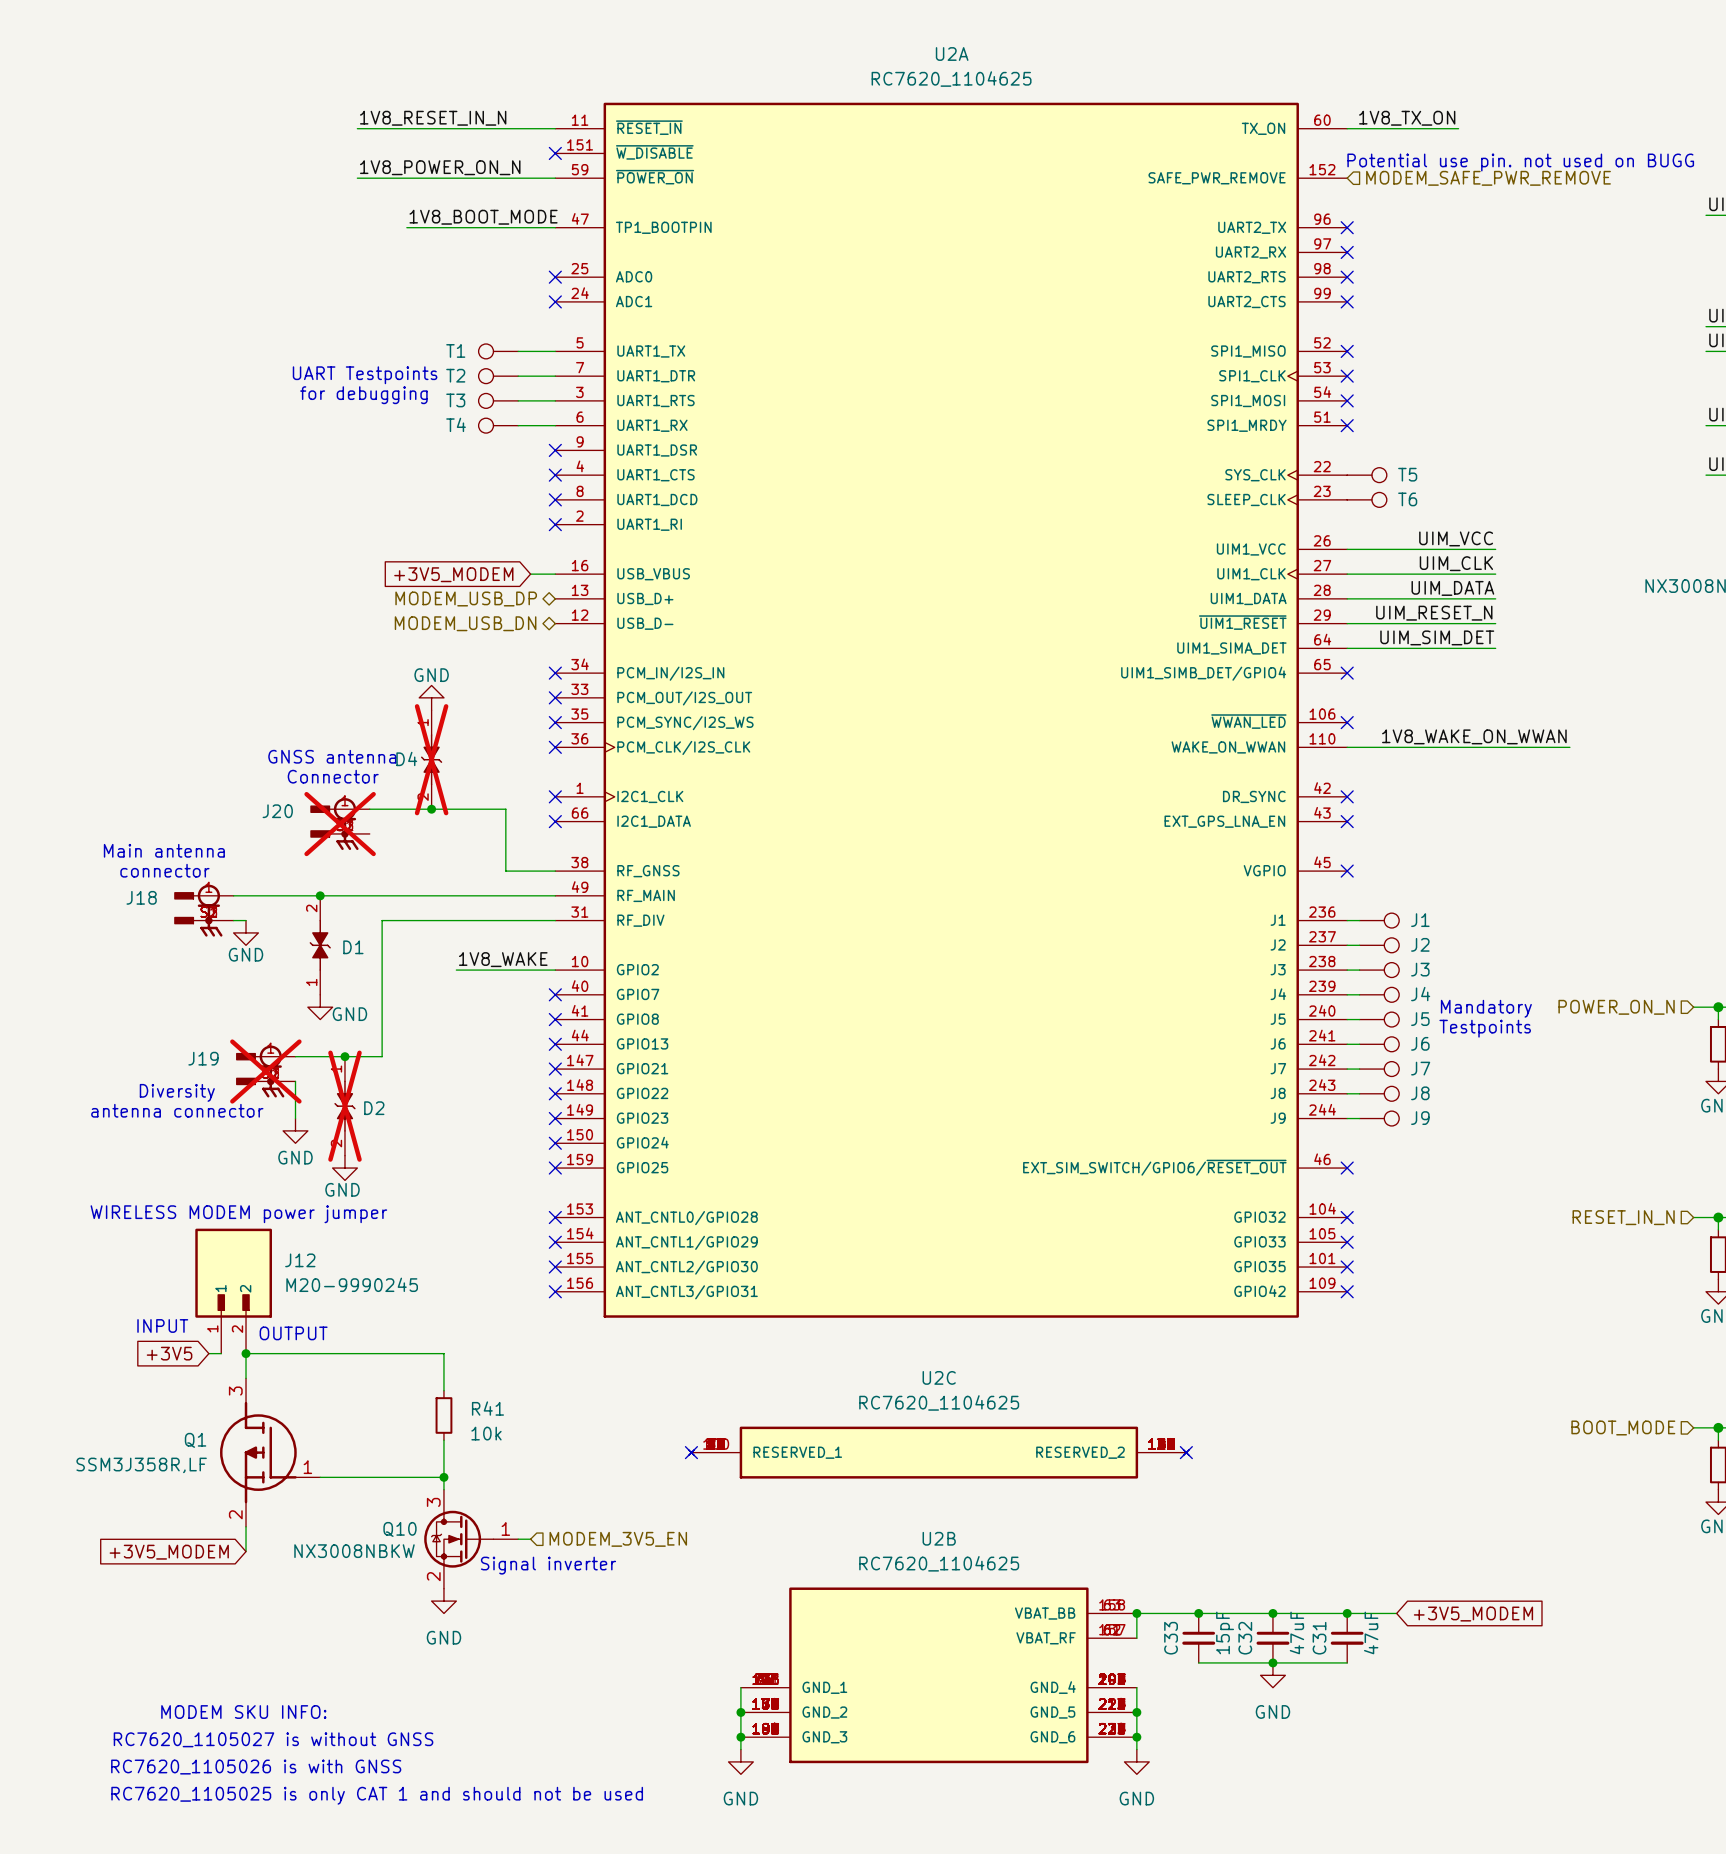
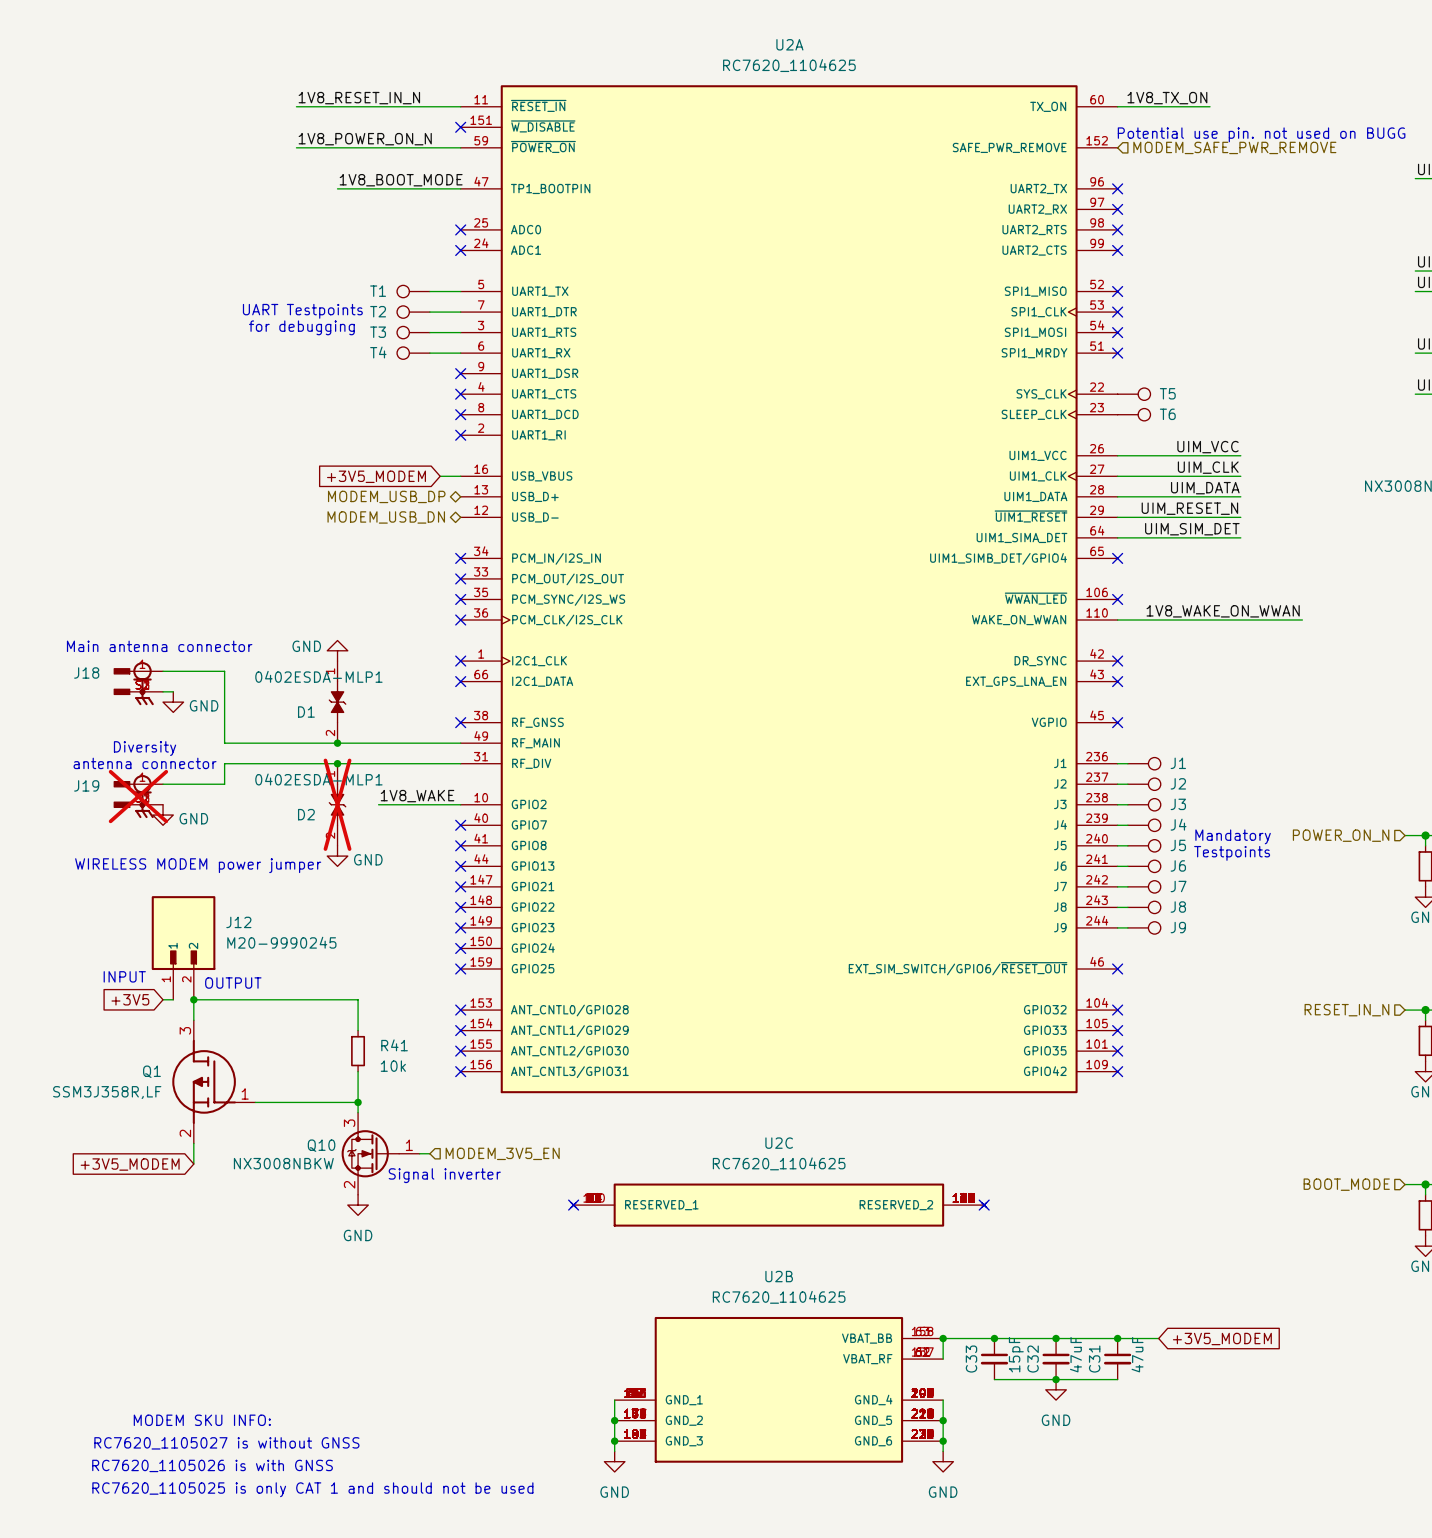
power symbol text position: GND (431, 675) -> GND (306, 646)
power symbol position: GND (431, 697) -> GND (337, 650)
text: GNSS antenna (332, 756) -> none
D4: (431, 759) -> none
text: Connector (333, 776) -> none
text: none -> Main antenna connector (159, 646)
wire: (369, 809) (505, 809) (505, 871) (555, 871) -> none
junction: (431, 809) -> none
D1 value: none -> 0402ESDA-MLP1 (318, 676)
J20: (340, 824) -> none
power symbol: none -> GND (173, 702)
text: Main antenna (164, 850) -> none
text: connector (164, 870) -> none
no-connect mark: none -> (460, 722)
wire: (233, 895) (270, 895) -> (163, 671) (224, 671) (224, 743)
junction: (320, 895) -> none
junction: none -> (337, 743)
J18 position: (204, 910) -> (138, 683)
wire: (233, 920) (246, 920) -> (163, 691) (173, 691)
wire: (382, 920) (382, 1056) (295, 1056) -> (316, 763) (224, 763) (224, 784) (163, 784)
junction: none -> (337, 763)
power symbol: GND (246, 932) -> none
D2 value: none -> 0402ESDA-MLP1 (318, 779)
D1 rotation: 0° (320, 945) -> 180° (337, 702)
D1 position: (320, 945) -> (337, 702)
power symbol: none -> GND (163, 815)
power symbol: GND (320, 1007) -> none
power symbol: none -> GND (337, 856)
junction: (344, 1056) -> none
J19 position: (265, 1071) -> (138, 796)
wire: (295, 1081) (295, 1118) -> none
text position: Diversity (177, 1092) -> Diversity (145, 748)
D2 position: (344, 1106) -> (337, 804)
D2 name position: D2 (374, 1108) -> D2 (306, 814)
text position: antenna connector (177, 1110) -> antenna connector (145, 763)
power symbol: GND (295, 1130) -> none
power symbol: GND (344, 1168) -> none
junction: none -> (193, 999)
text position: WIRELESS MODEM power jumper (238, 1214) -> WIRELESS MODEM power jumper (198, 865)
J12 position: (233, 1291) -> (183, 947)
text position: INPUT (162, 1325) -> INPUT (124, 976)
junction: none -> (358, 1102)
text position: OUTPUT (293, 1333) -> OUTPUT (233, 983)
global label position: +3V5 (169, 1353) -> +3V5 (130, 999)
wire: (208, 1353) (221, 1353) -> (163, 999) (173, 999)
junction: (246, 1353) -> none
wire: (246, 1378) (246, 1353) (443, 1353) (443, 1390) -> (193, 1020) (193, 999) (358, 999) (358, 1030)
R41 position: (443, 1415) -> (358, 1051)
wire: (443, 1440) (443, 1489) -> (358, 1071) (358, 1112)
Q1 position: (270, 1452) -> (213, 1081)
power symbol: none -> GND (358, 1205)
wire: (320, 1477) (443, 1477) -> (255, 1102) (358, 1102)
junction: (443, 1477) -> none
wire: (246, 1526) (246, 1551) -> (193, 1143) (193, 1164)
Q10 position: (471, 1539) -> (380, 1153)
wire: (518, 1539) (530, 1539) -> (419, 1153) (429, 1153)
hierarchical label position: MODEM_3V5_EN (618, 1539) -> MODEM_3V5_EN (502, 1153)
global label position: +3V5_MODEM (169, 1552) -> +3V5_MODEM (130, 1164)
text position: Signal inverter (548, 1565) -> Signal inverter (444, 1175)
power symbol: GND (443, 1601) -> none

